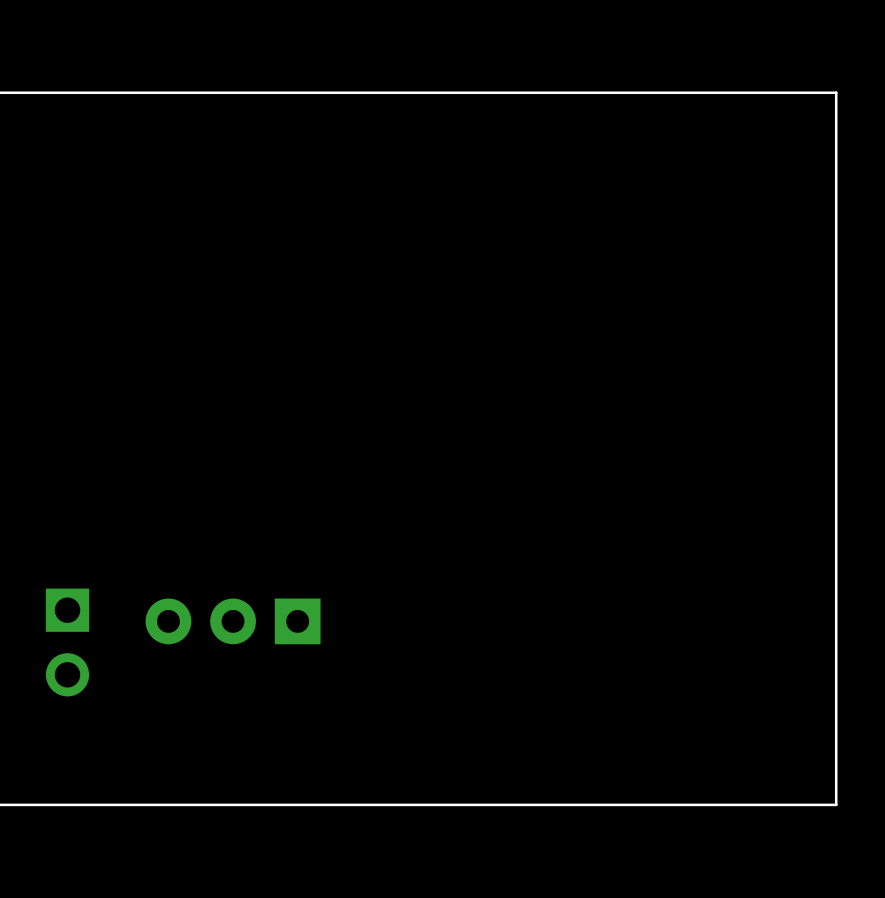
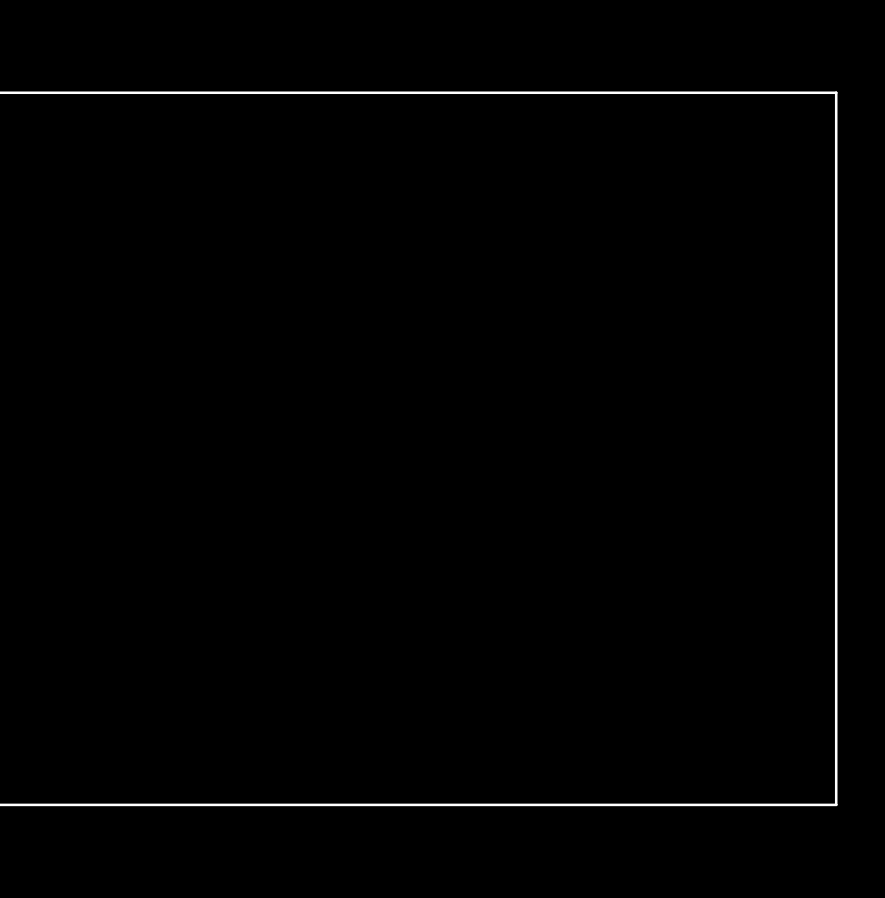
part: (233, 621) -> none
part: (67, 642) -> none

